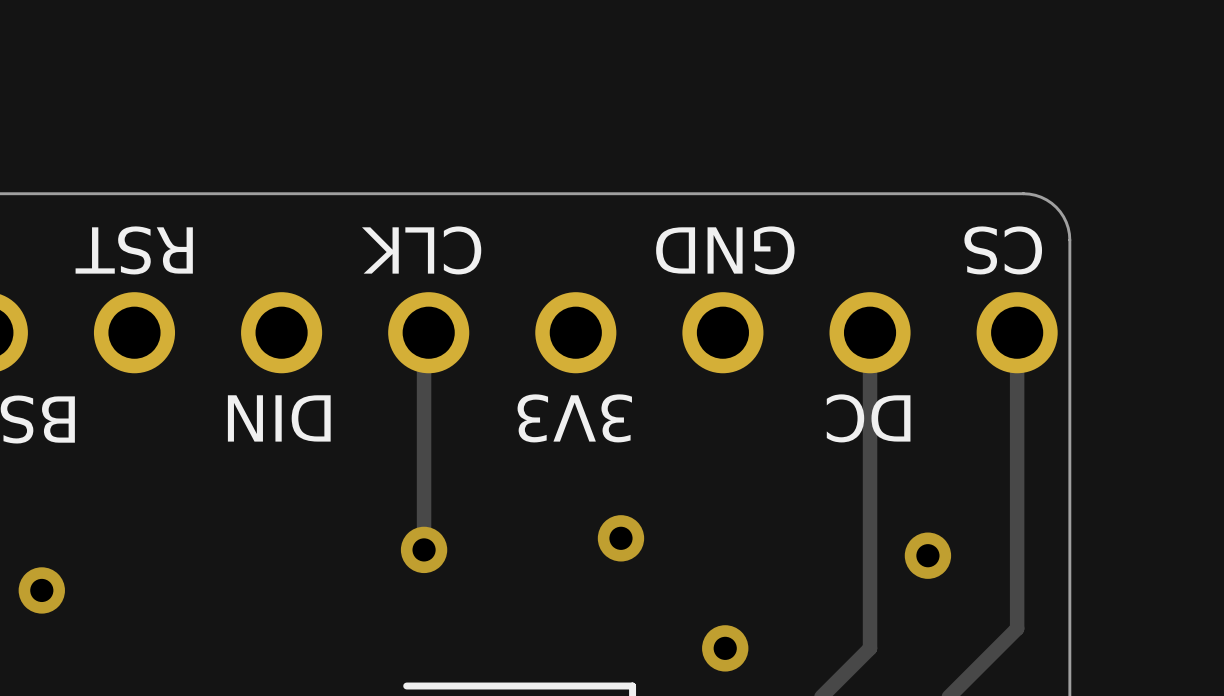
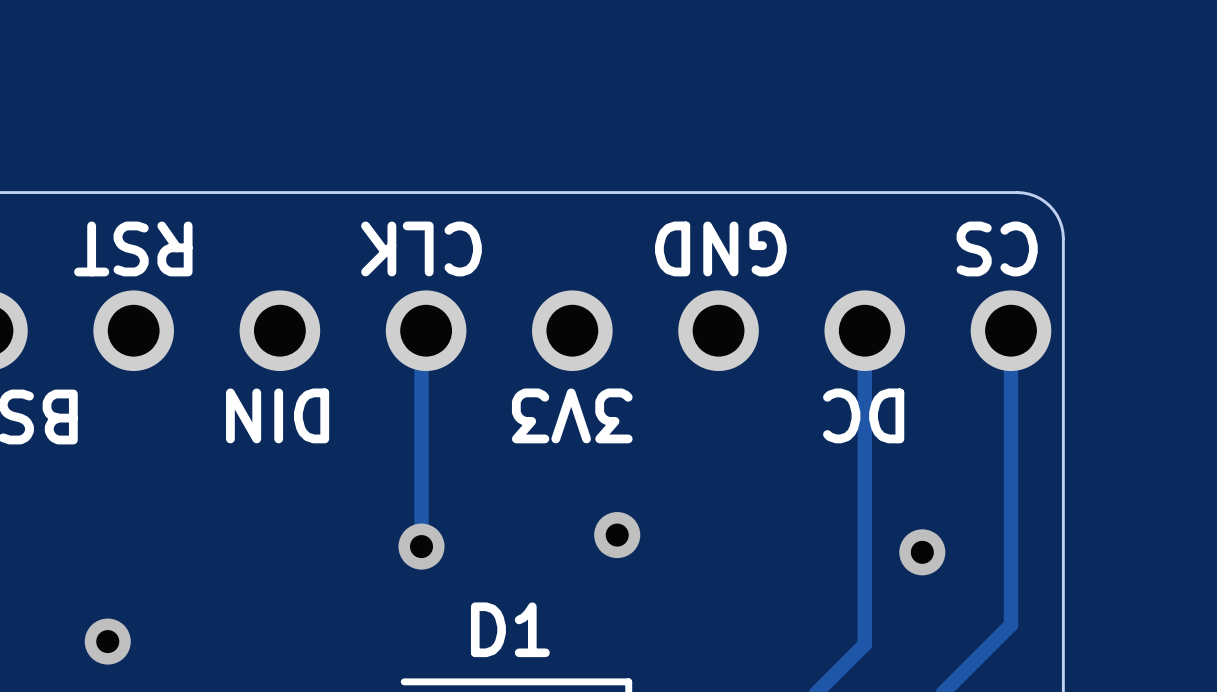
via: (41, 590) -> none
D1 name: none -> D1 (510, 629)
via: none -> (107, 641)
via: (725, 648) -> none

